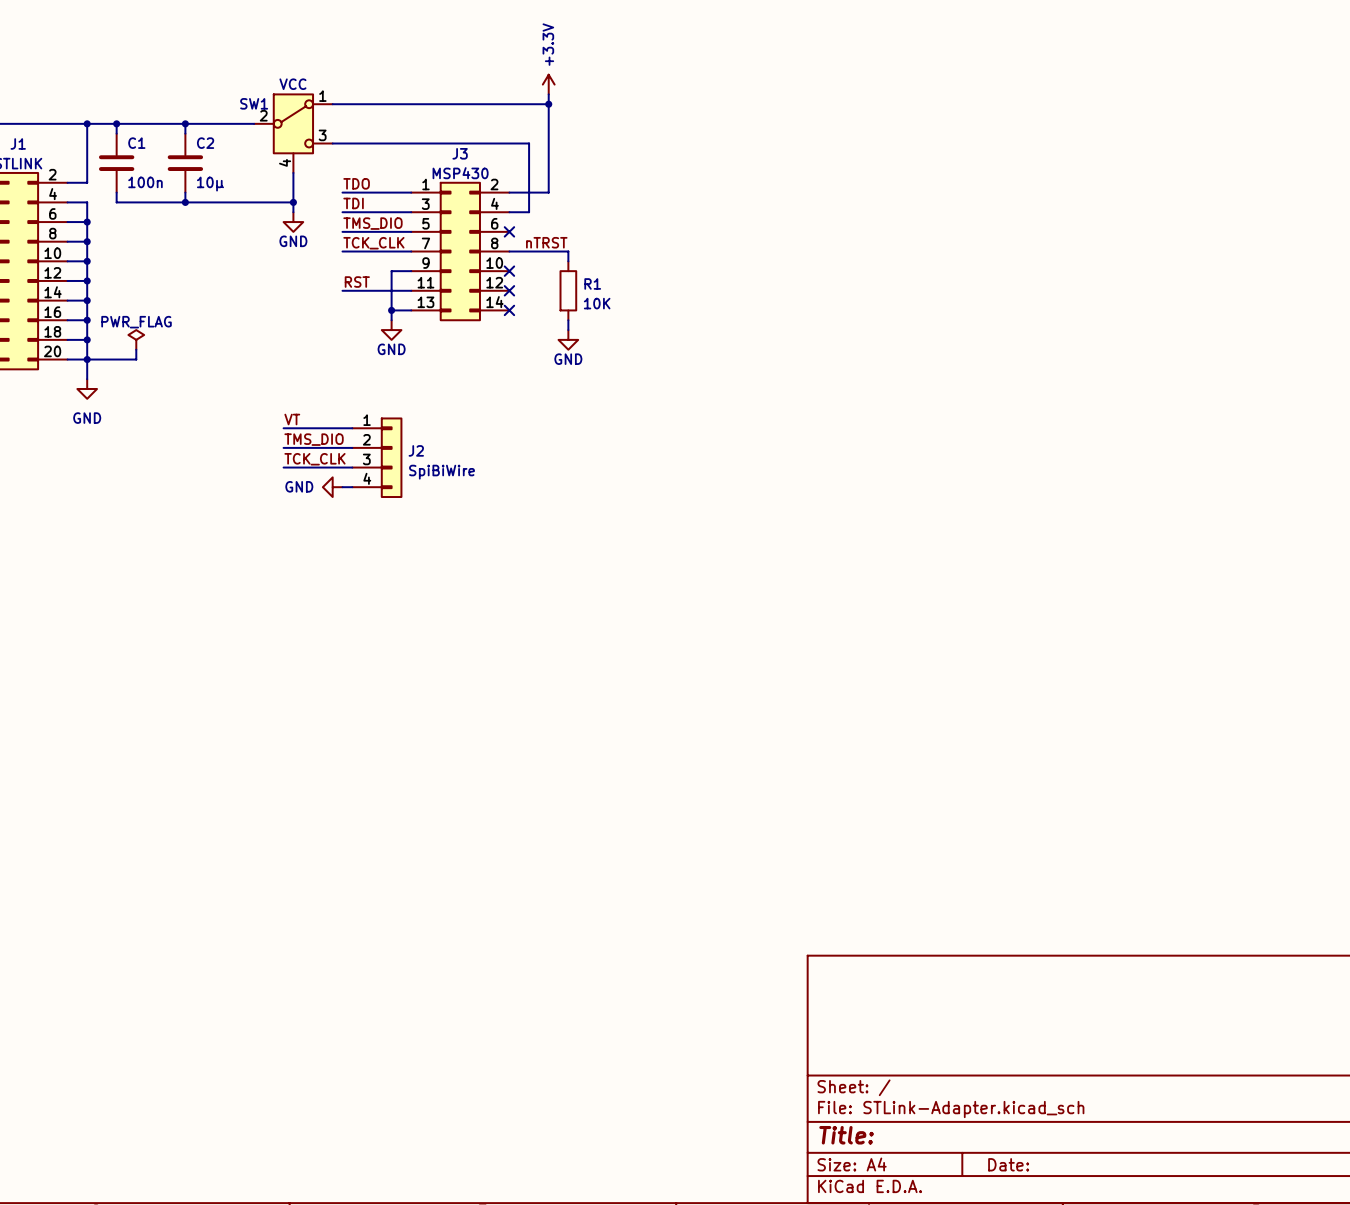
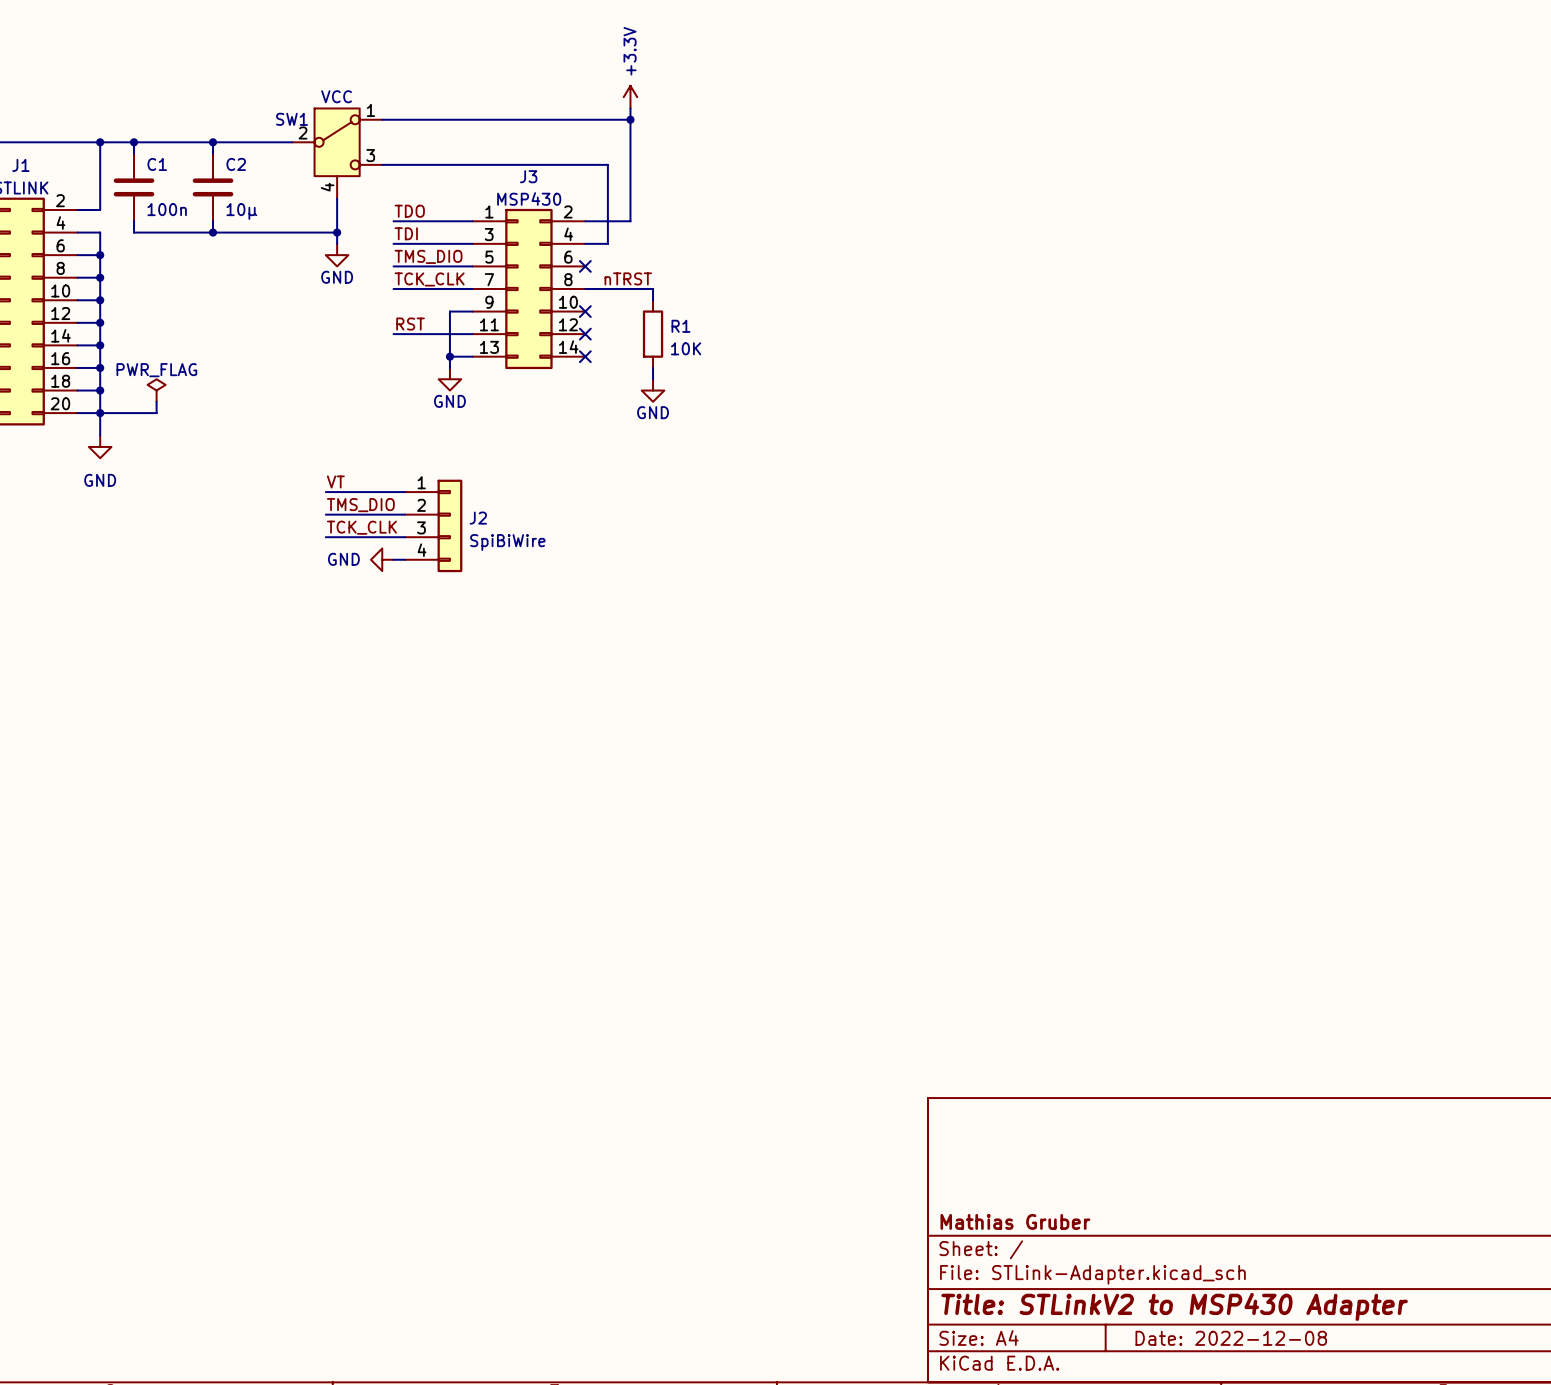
title block: none -> Mathias Gruber (1015, 1221)
title block: Title: (846, 1135) -> Title: STLinkV2 to MSP430 Adapter (1174, 1306)
title block: Date: (1008, 1164) -> Date: 2022-12-08 (1231, 1338)

